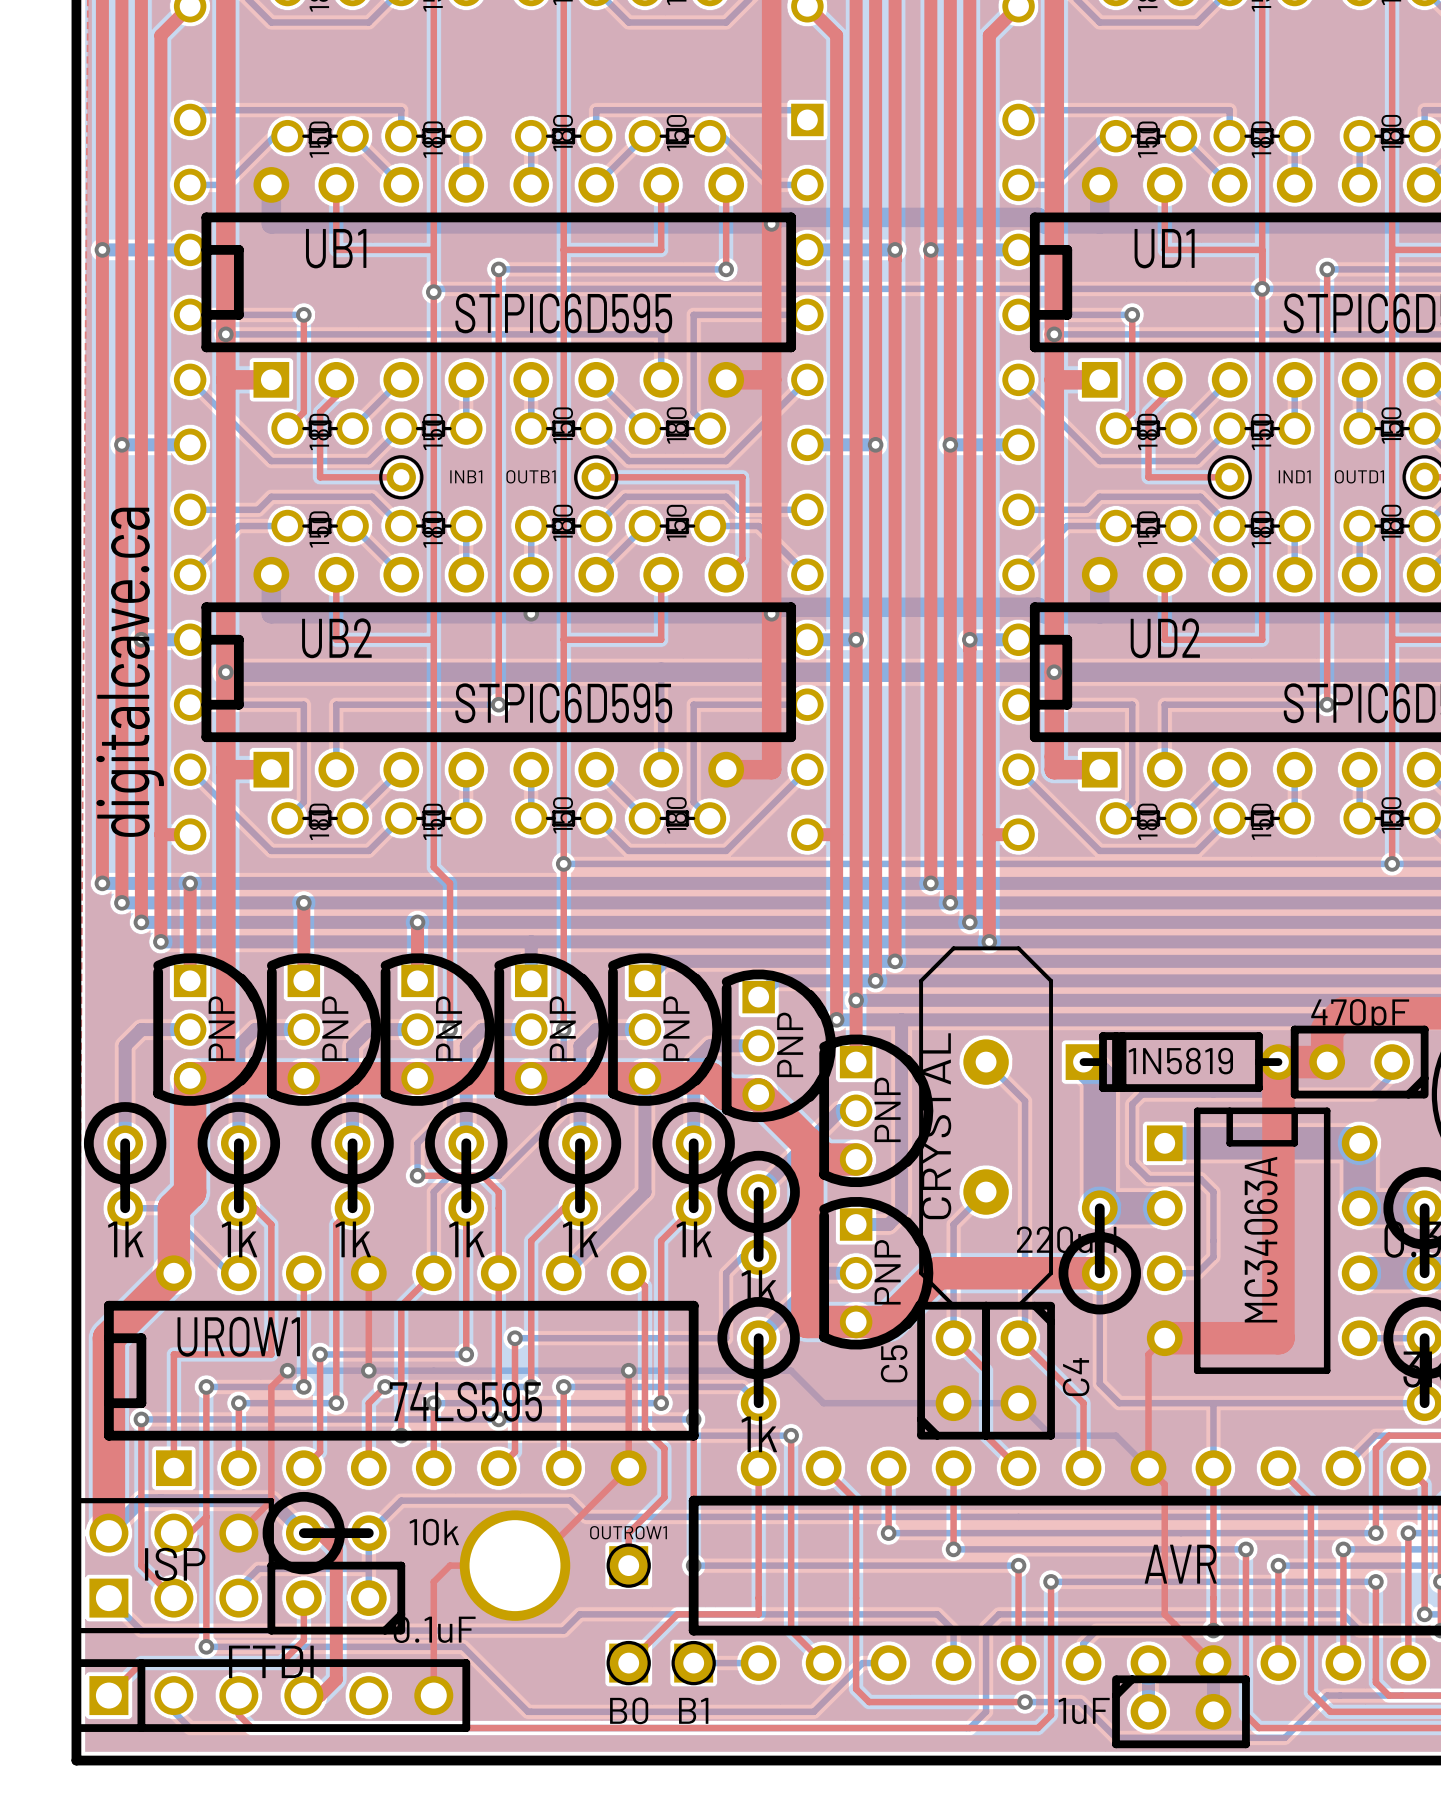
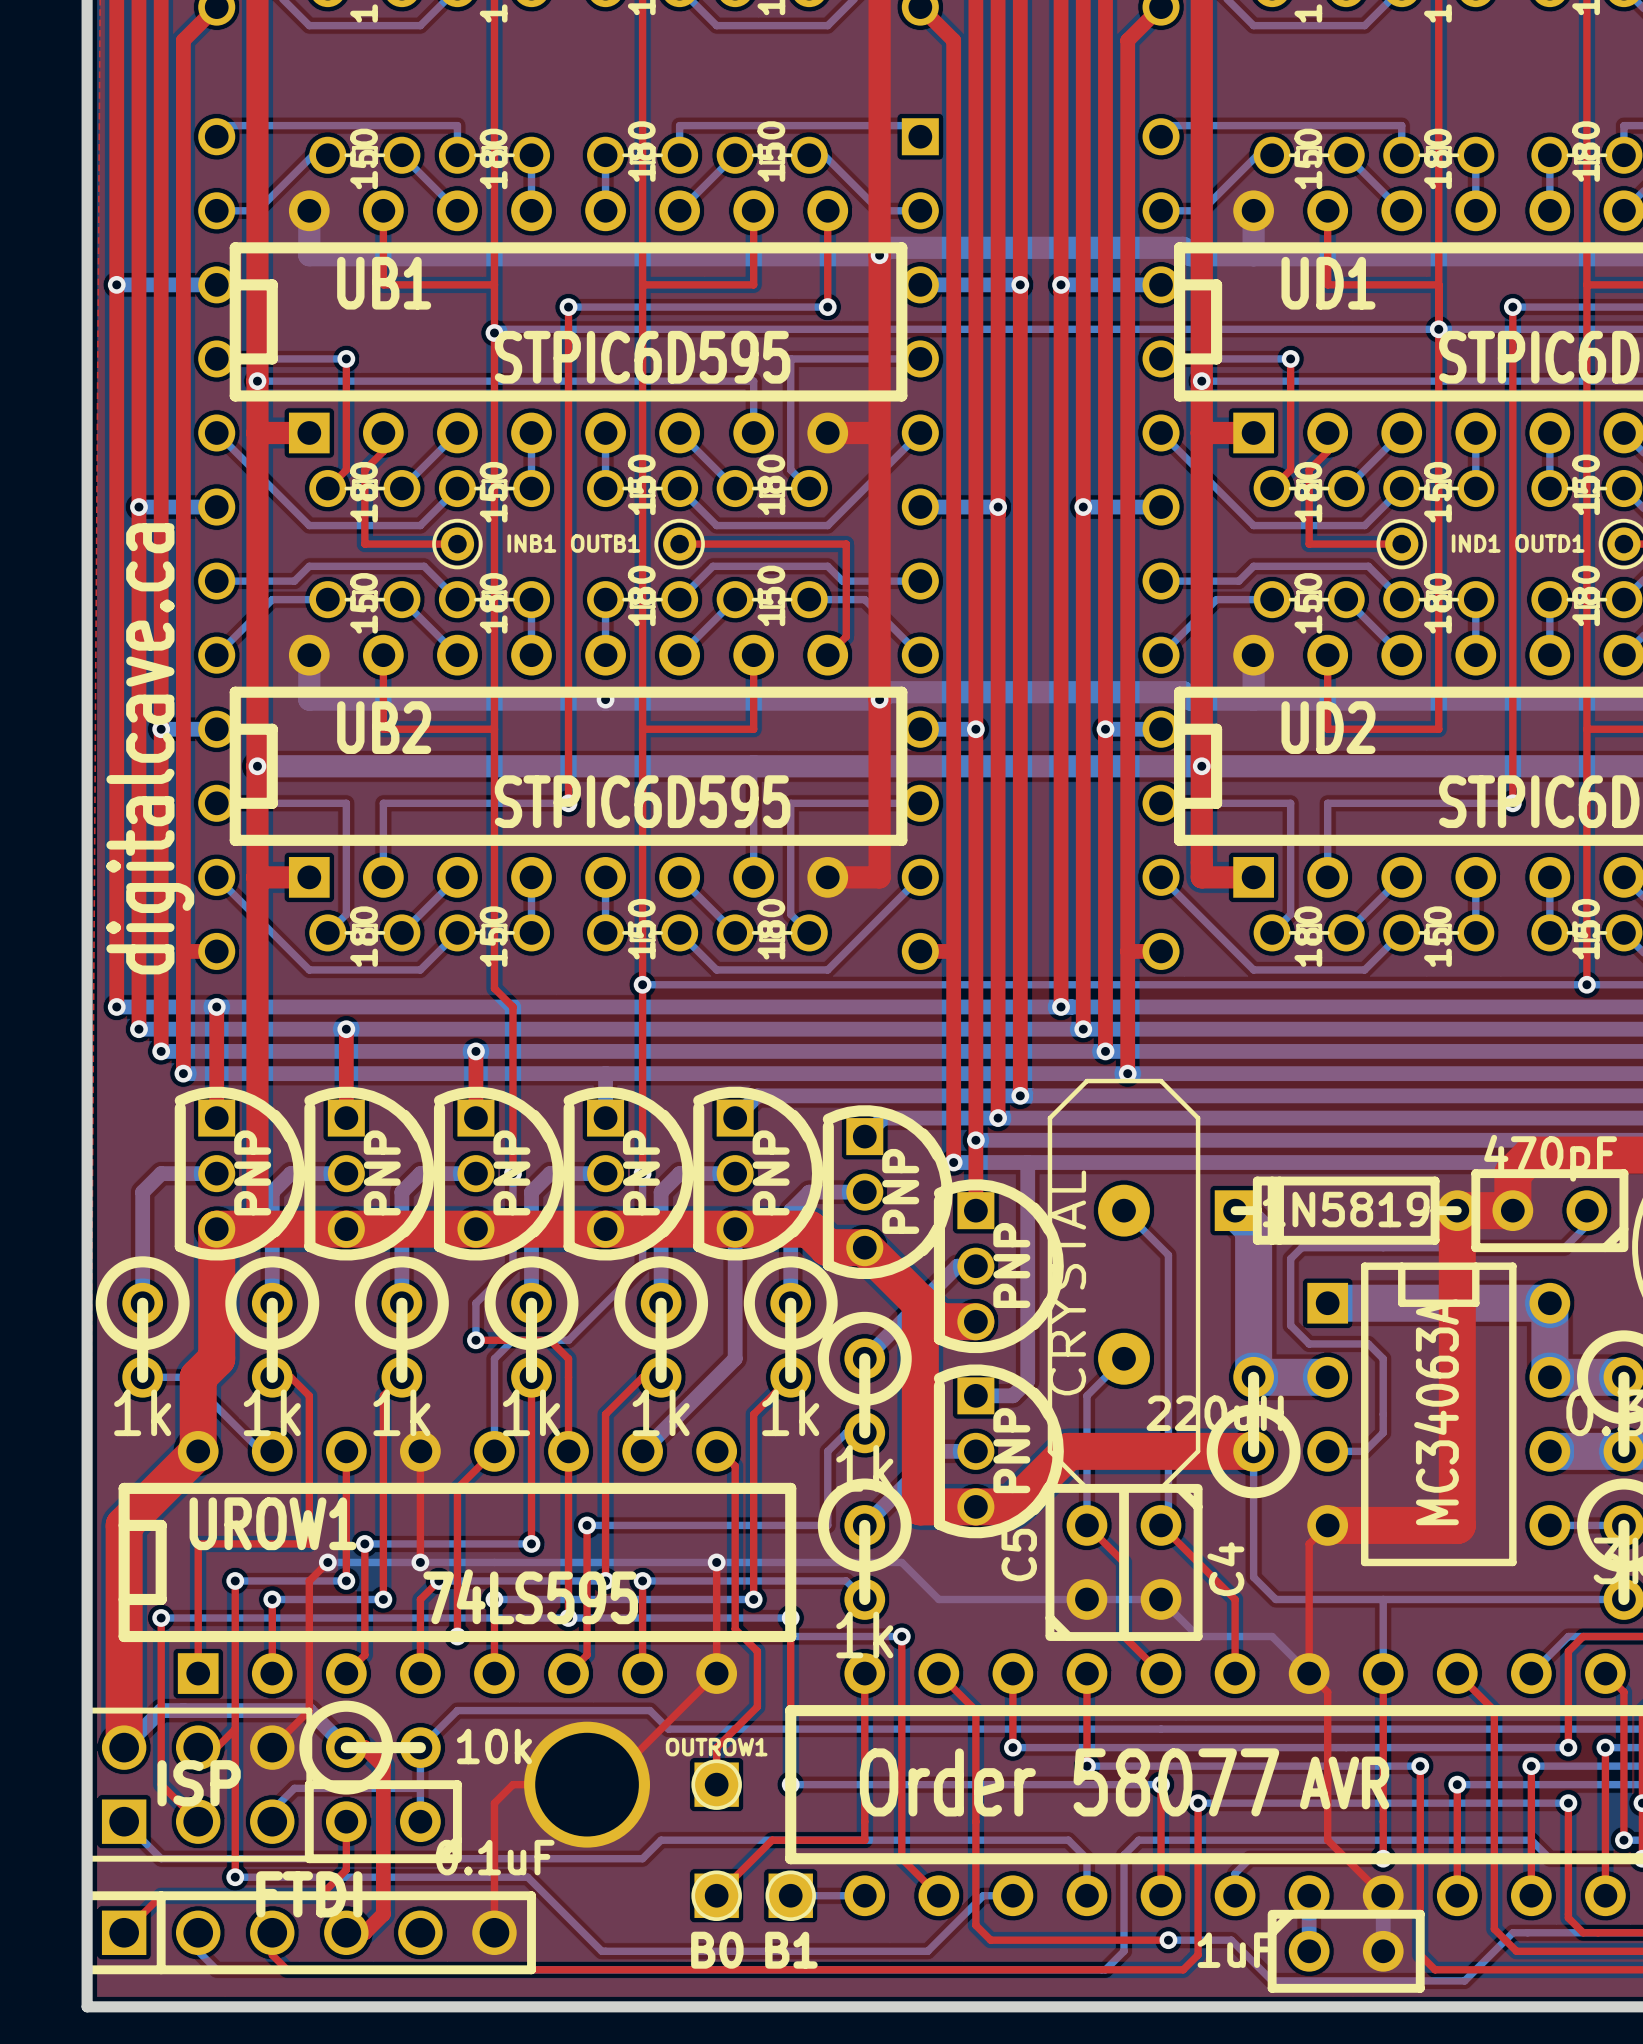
text position: digitalcave.ca (130, 672) -> digitalcave.ca (150, 748)
text: none -> Order 58077 (1069, 1782)

